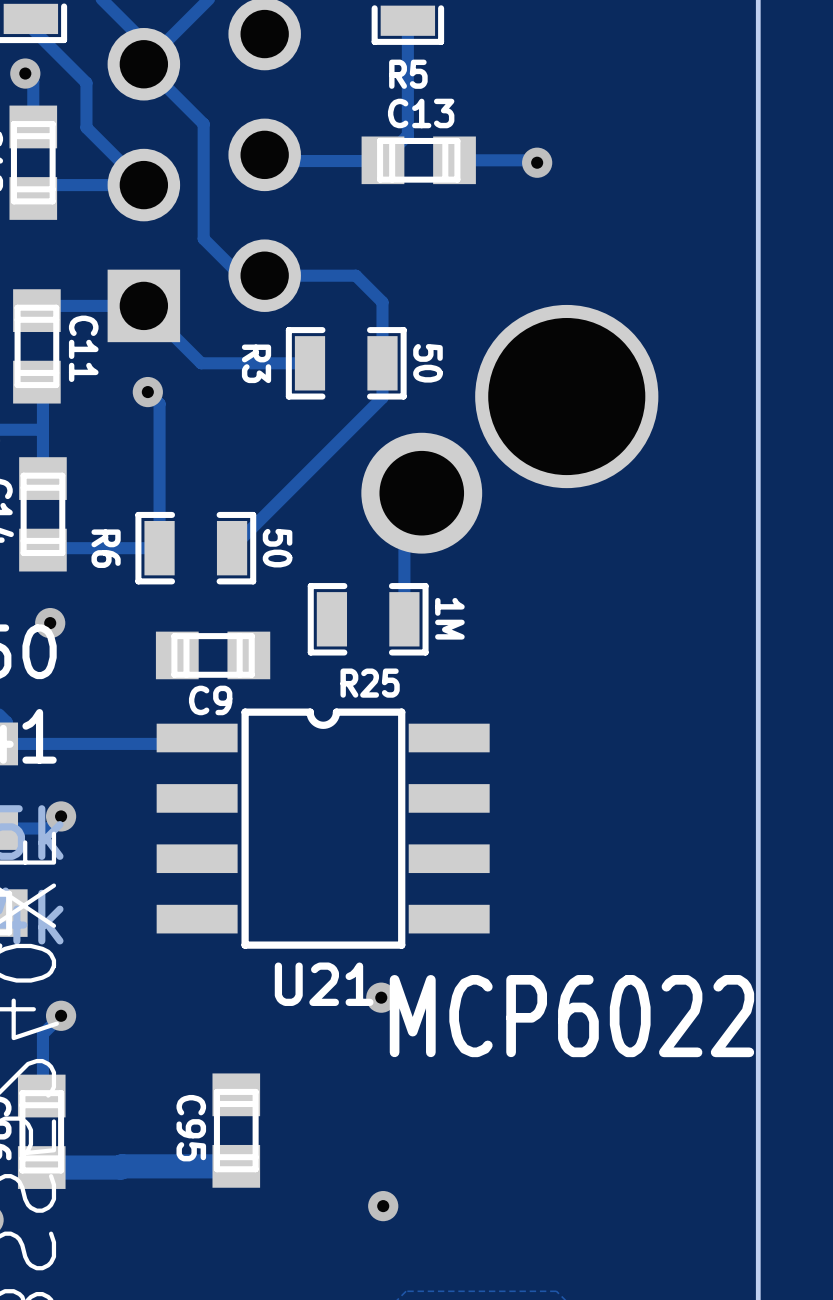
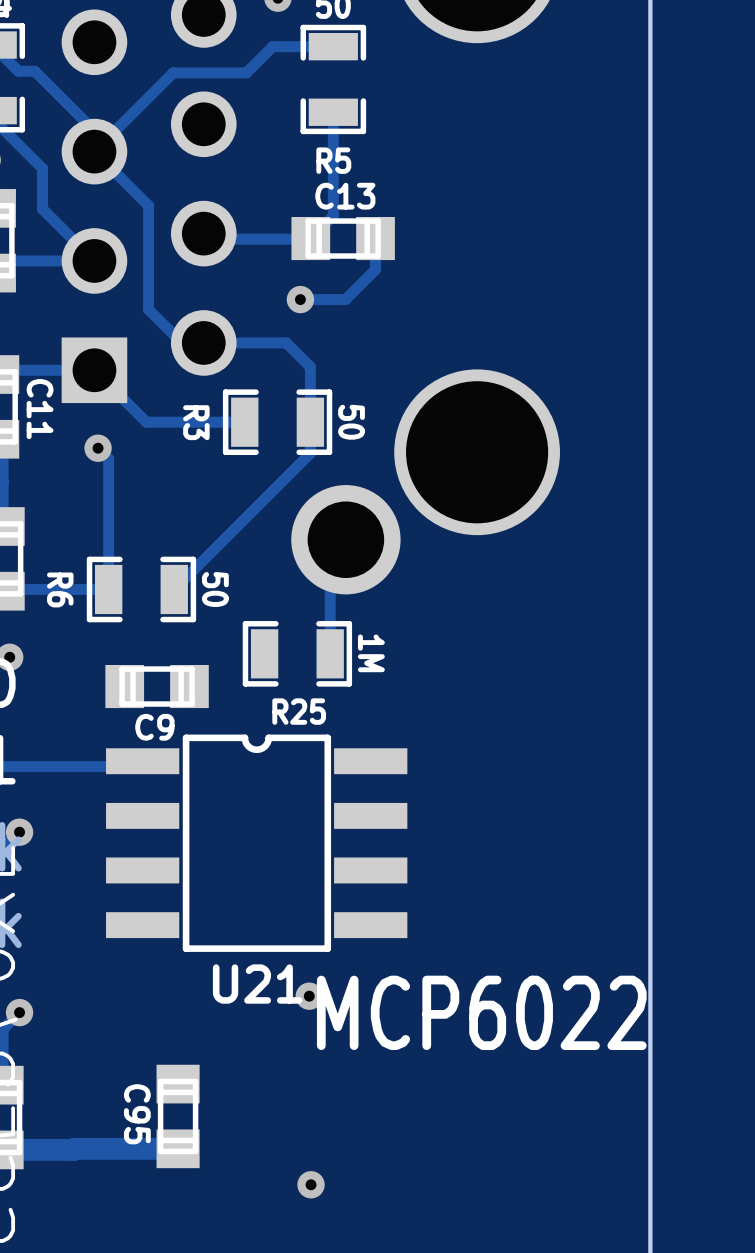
track: (454, 160) (534, 160) (537, 162) -> (375, 238) (375, 269) (345, 299) (300, 299)
via position: (537, 162) -> (300, 299)

